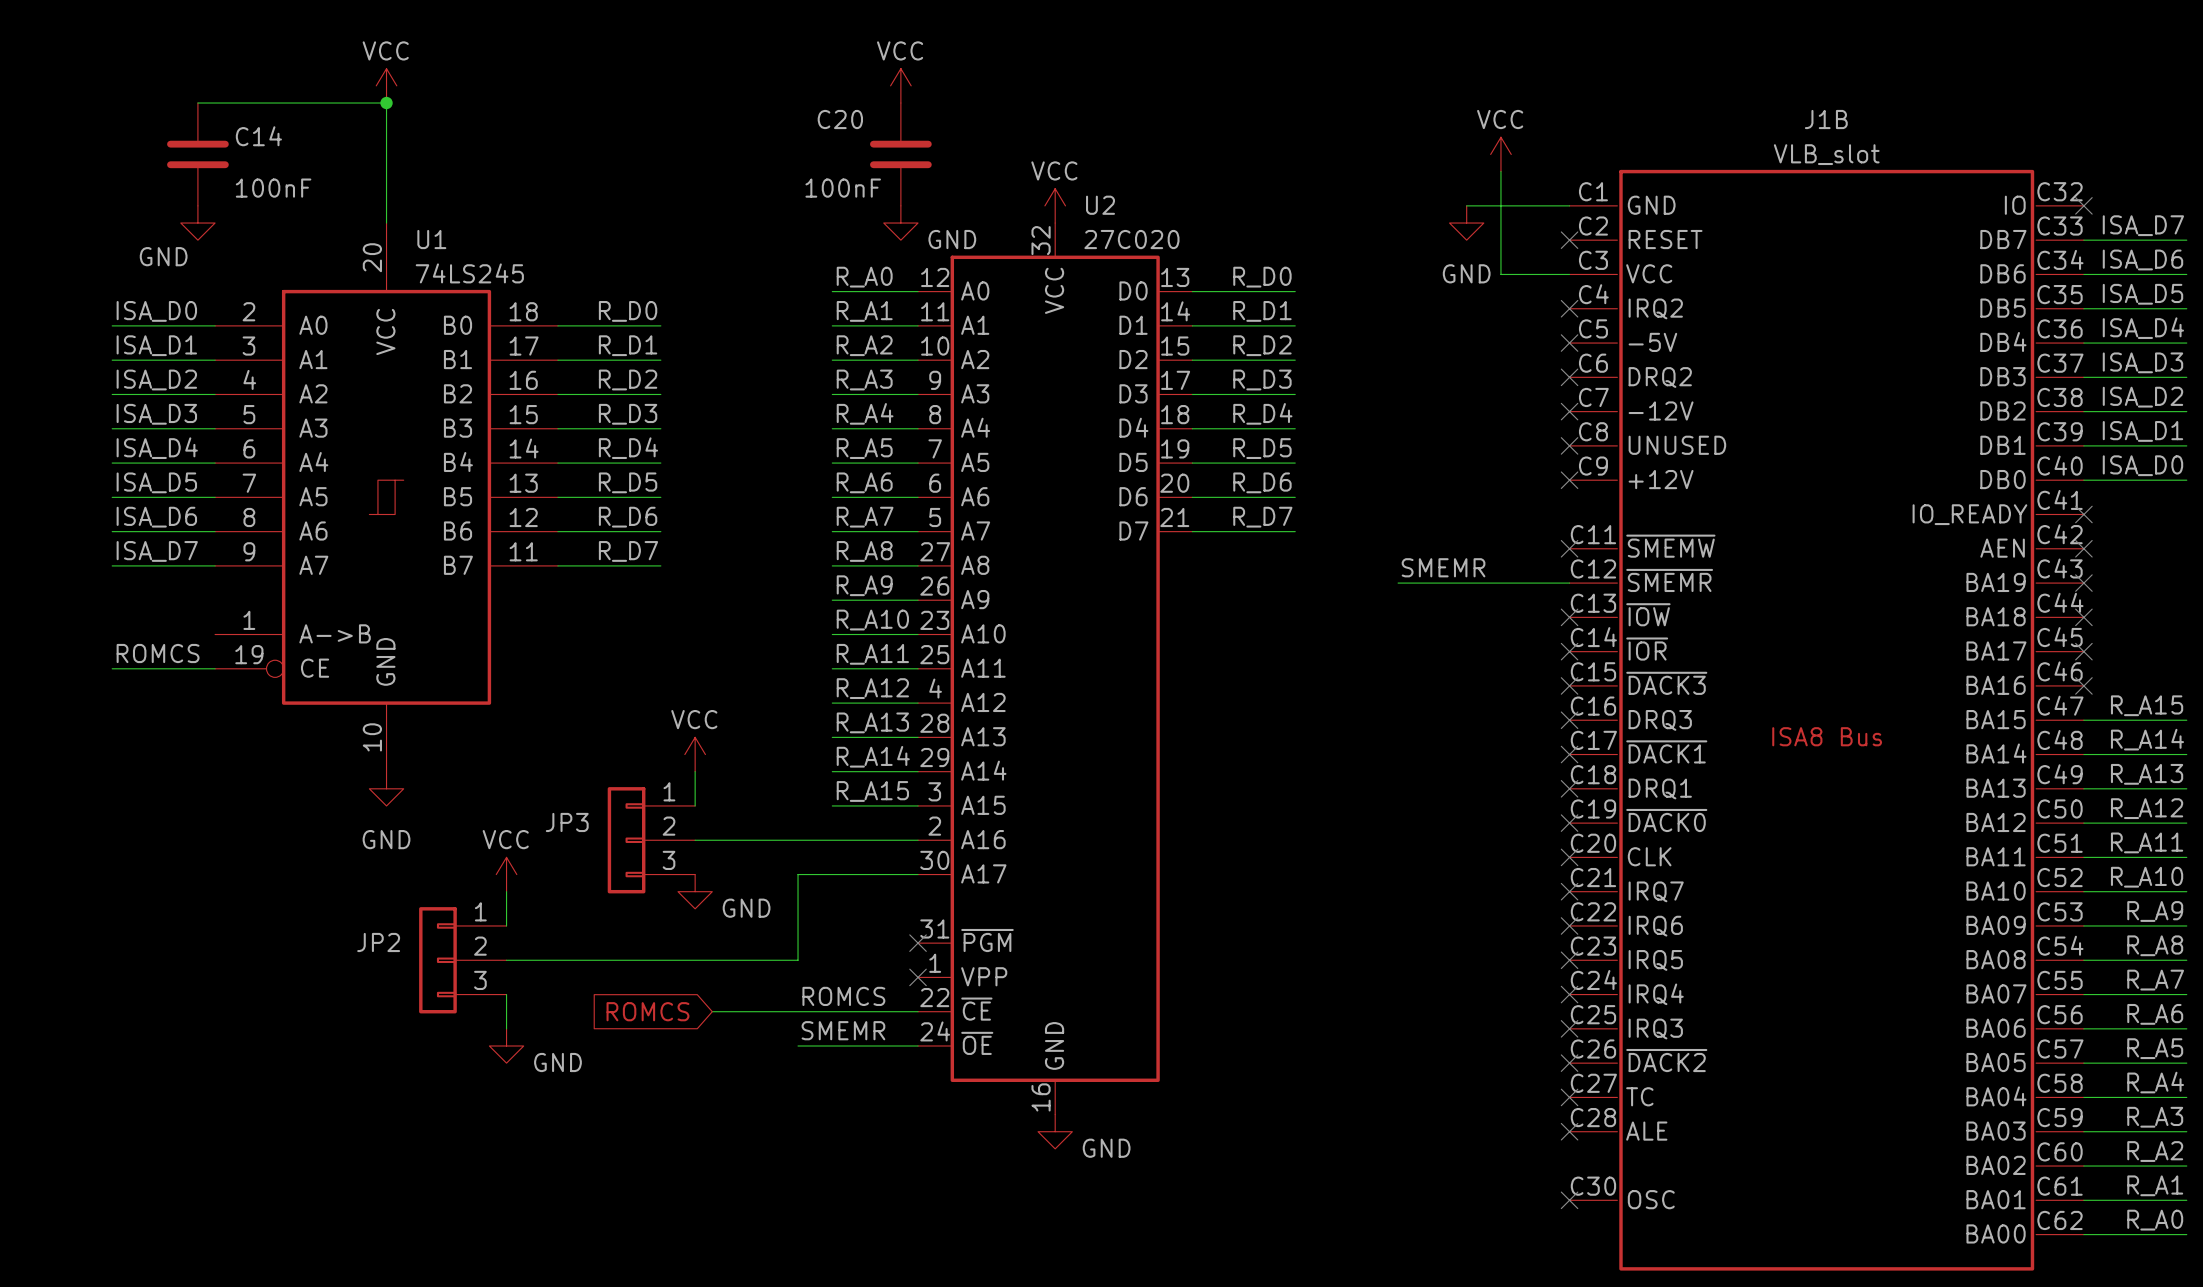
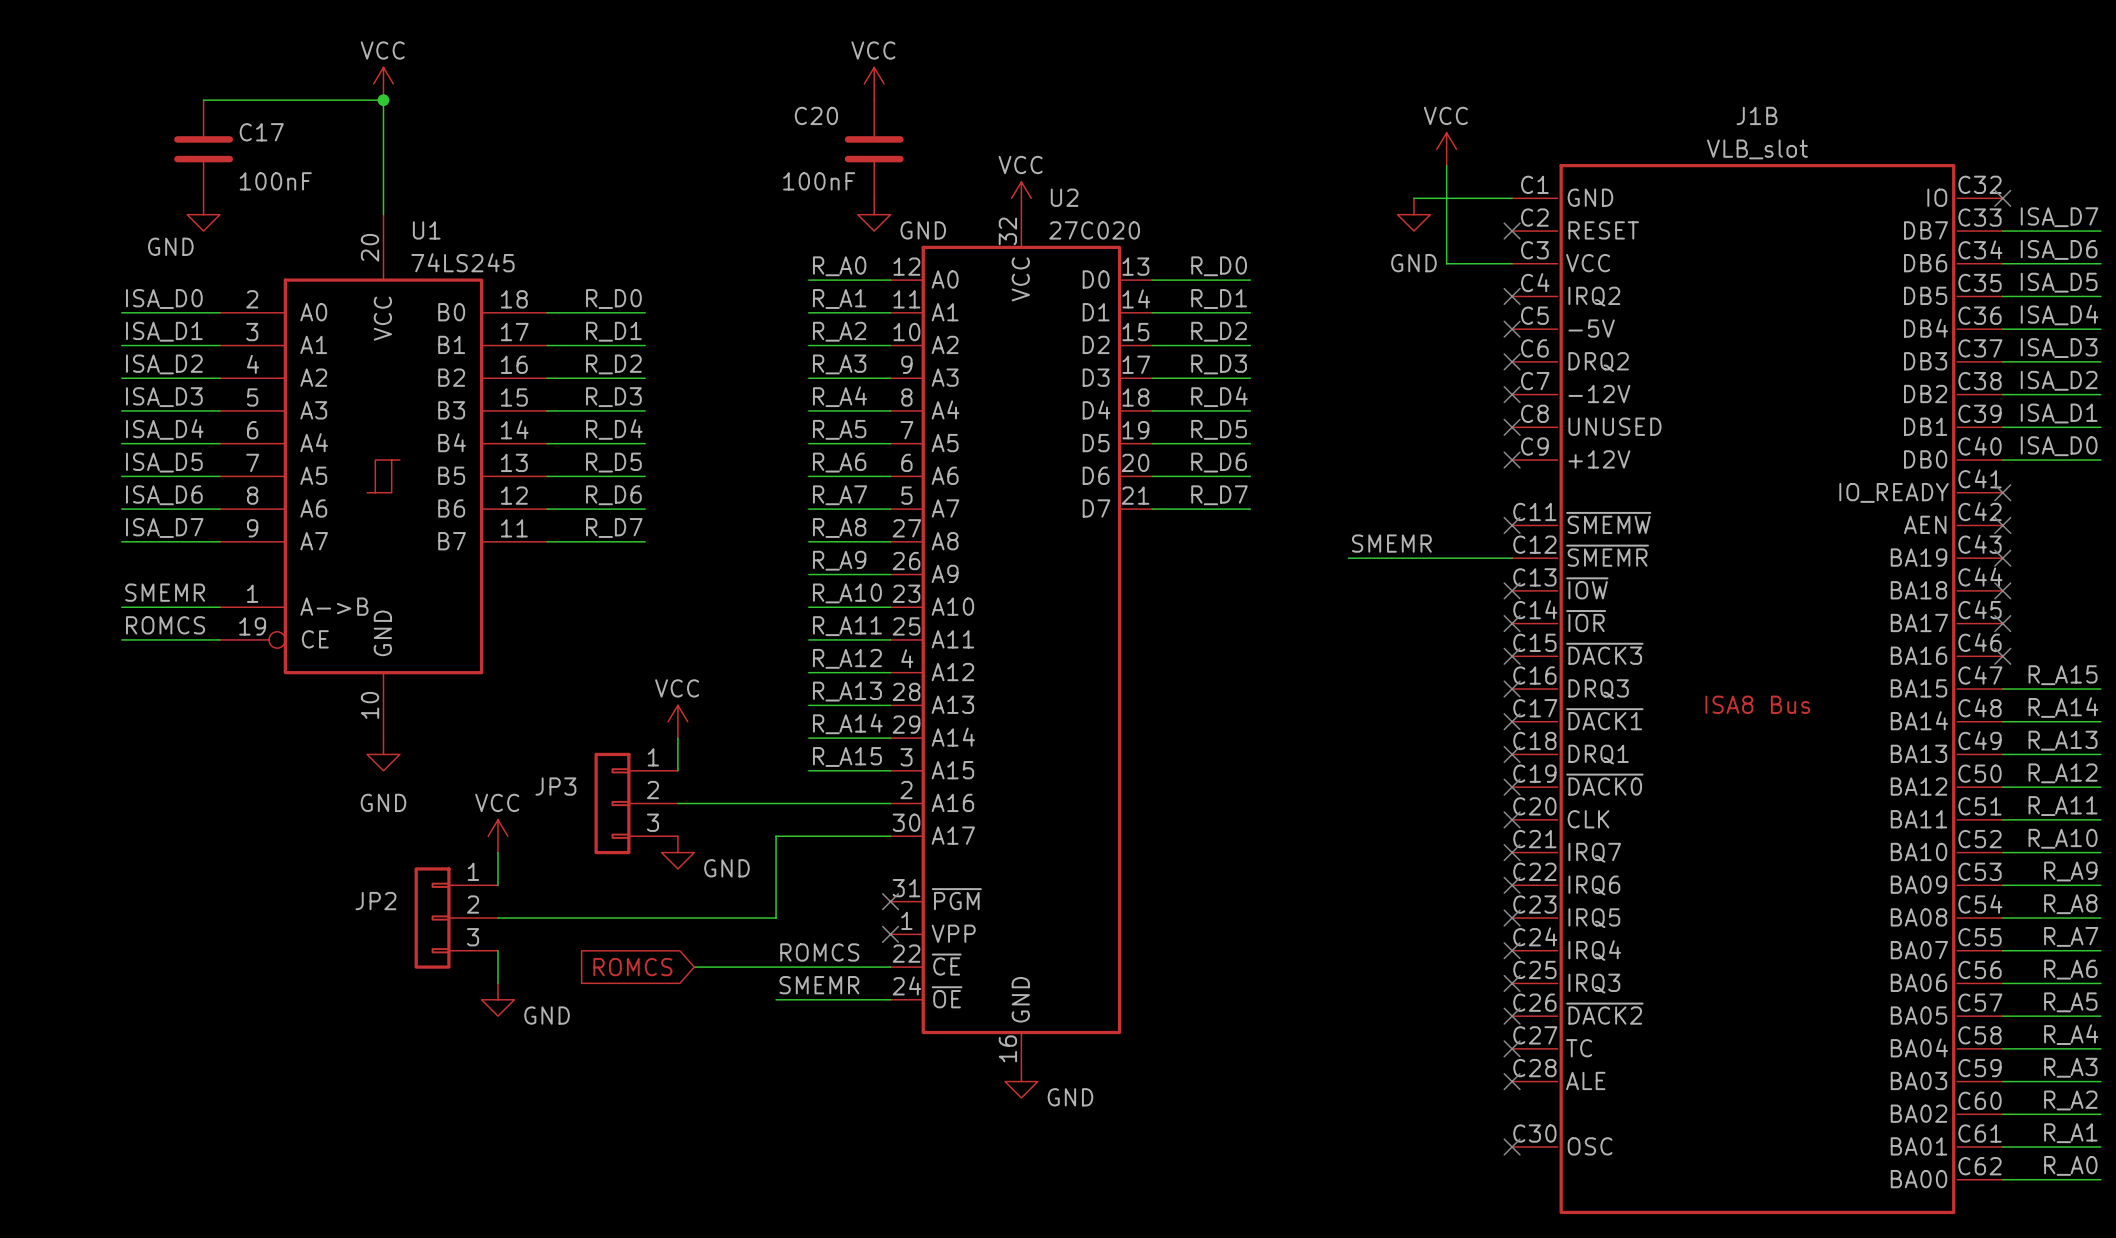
C14 name: C14 (258, 136) -> C17 (261, 132)
label: none -> SMEMR (165, 592)
wire: none -> (121, 607) (219, 607)

